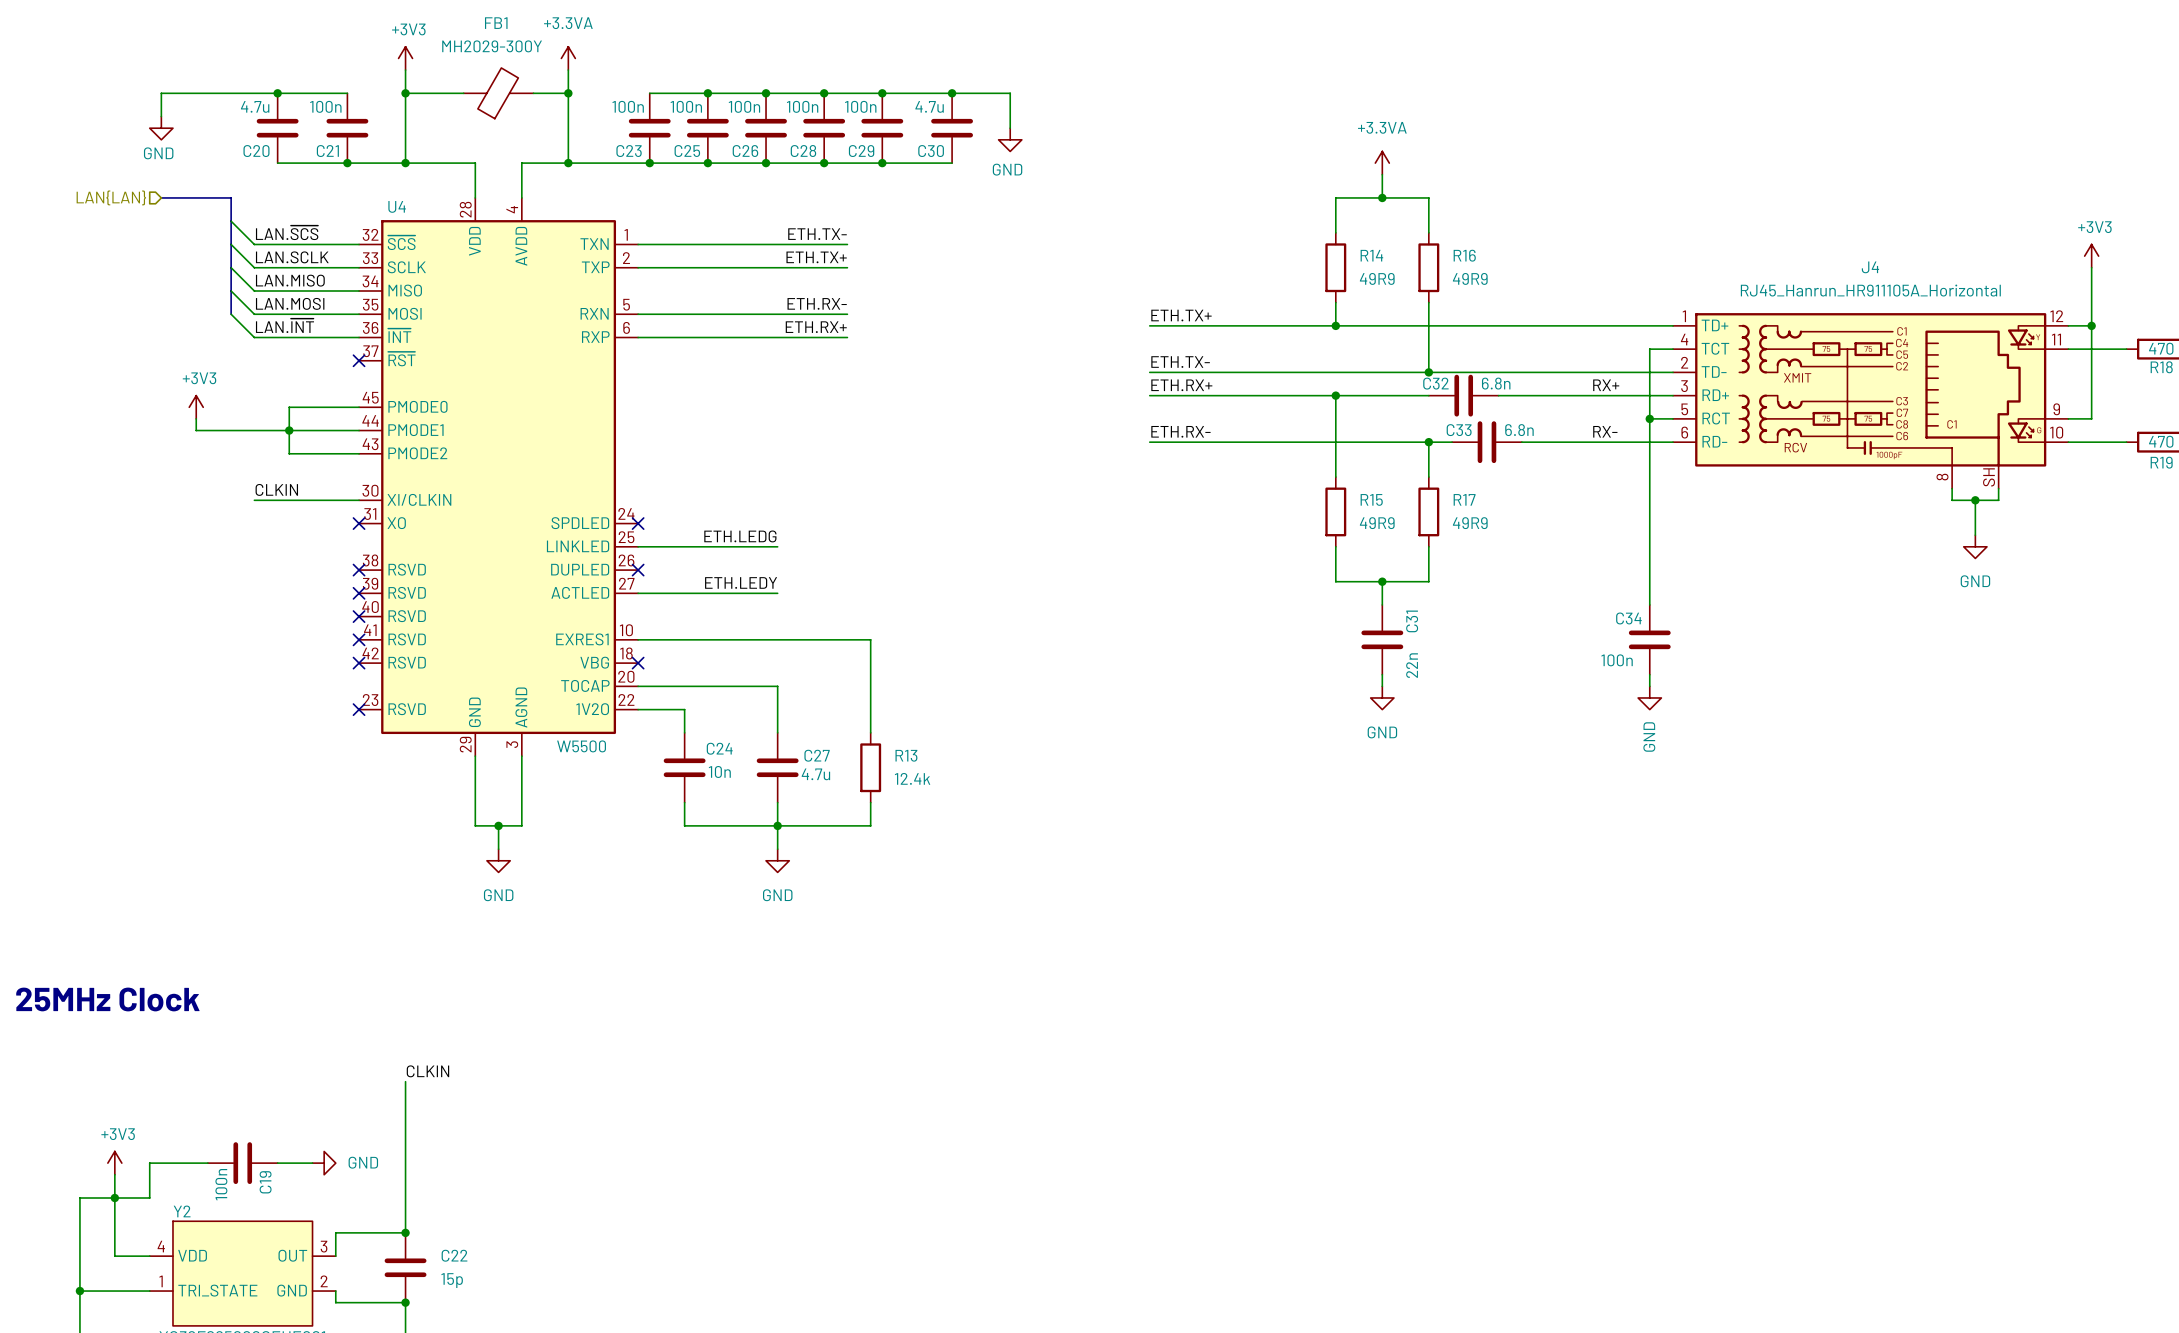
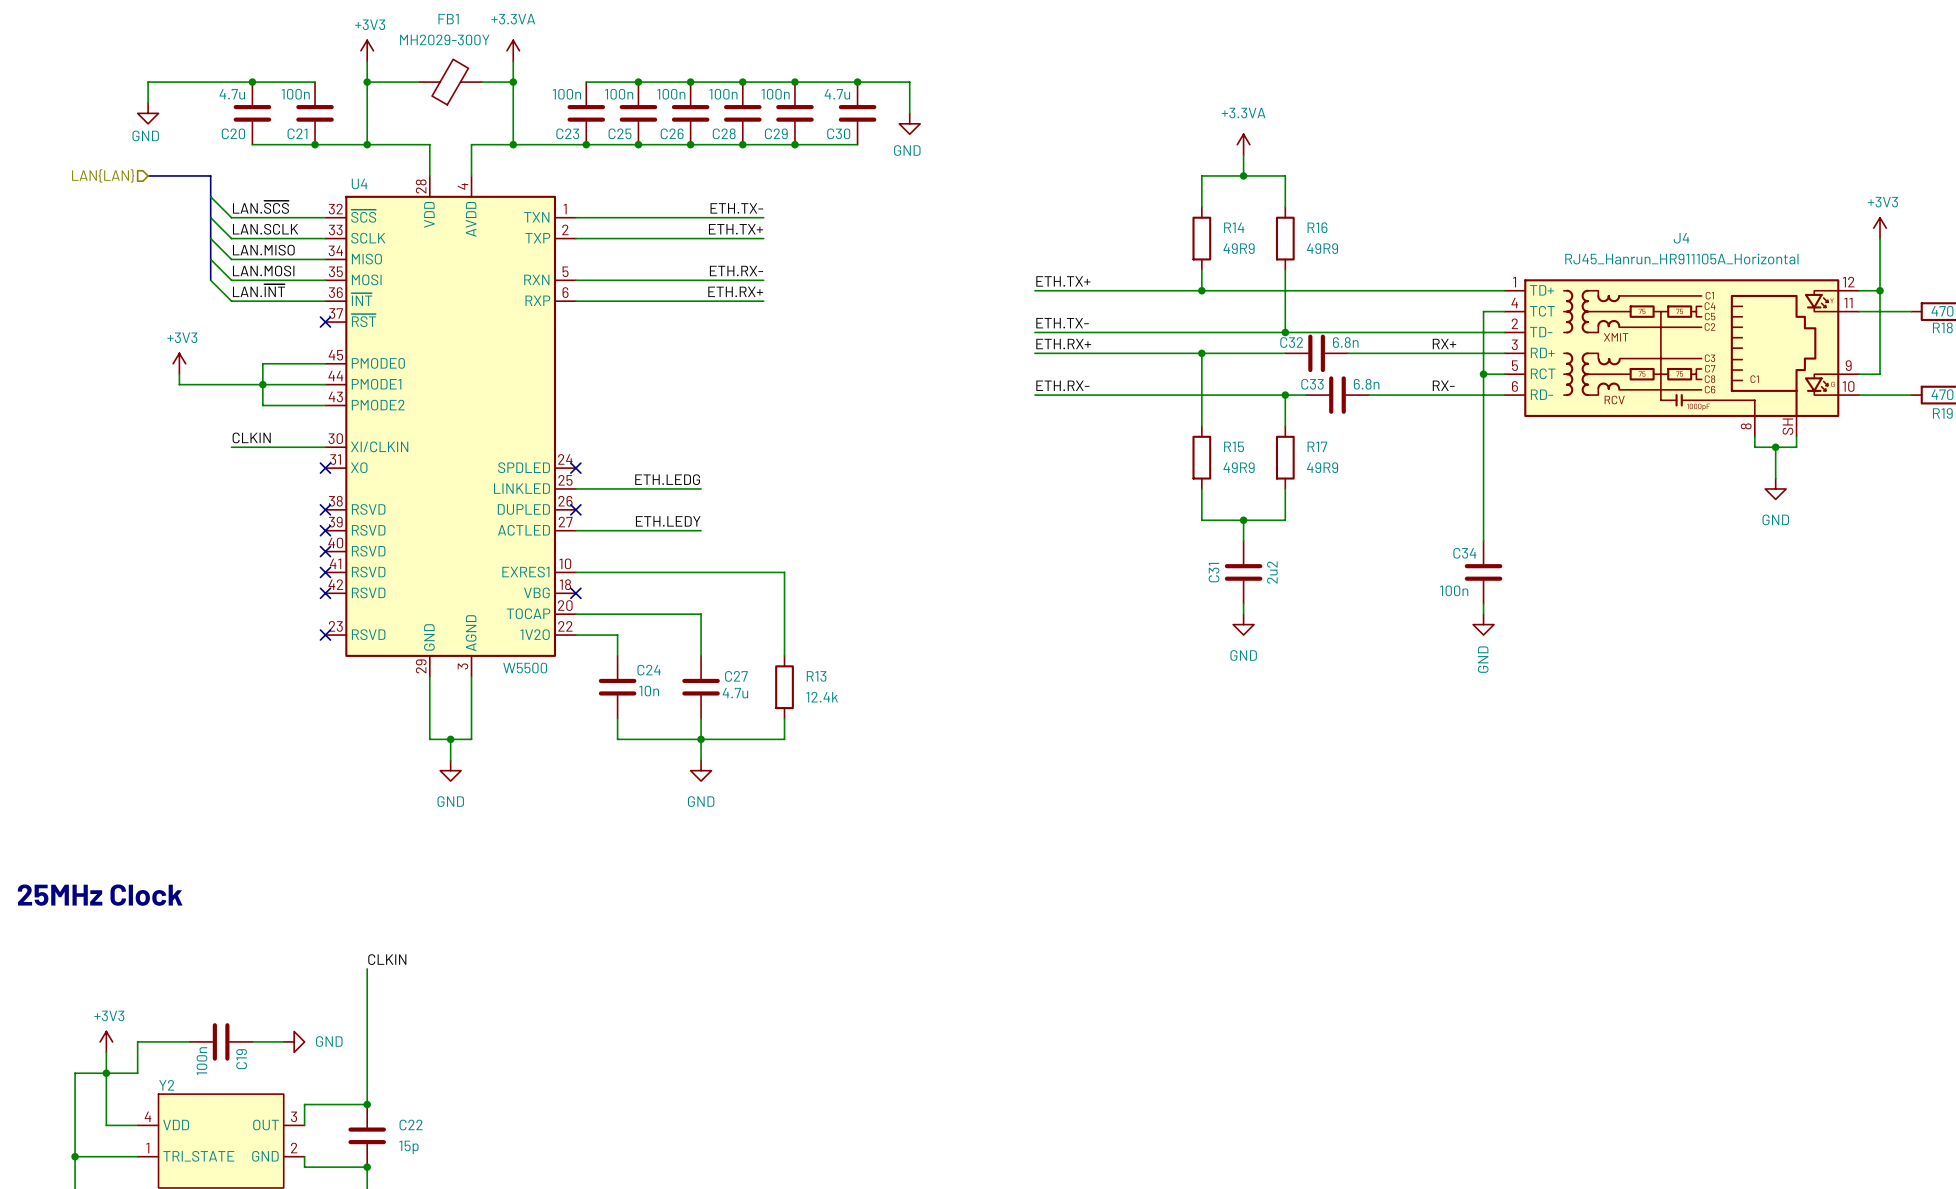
C31 name position: C31 (1412, 621) -> C31 (1213, 572)
C31 value: 22n (1412, 665) -> 2u2 (1272, 572)

